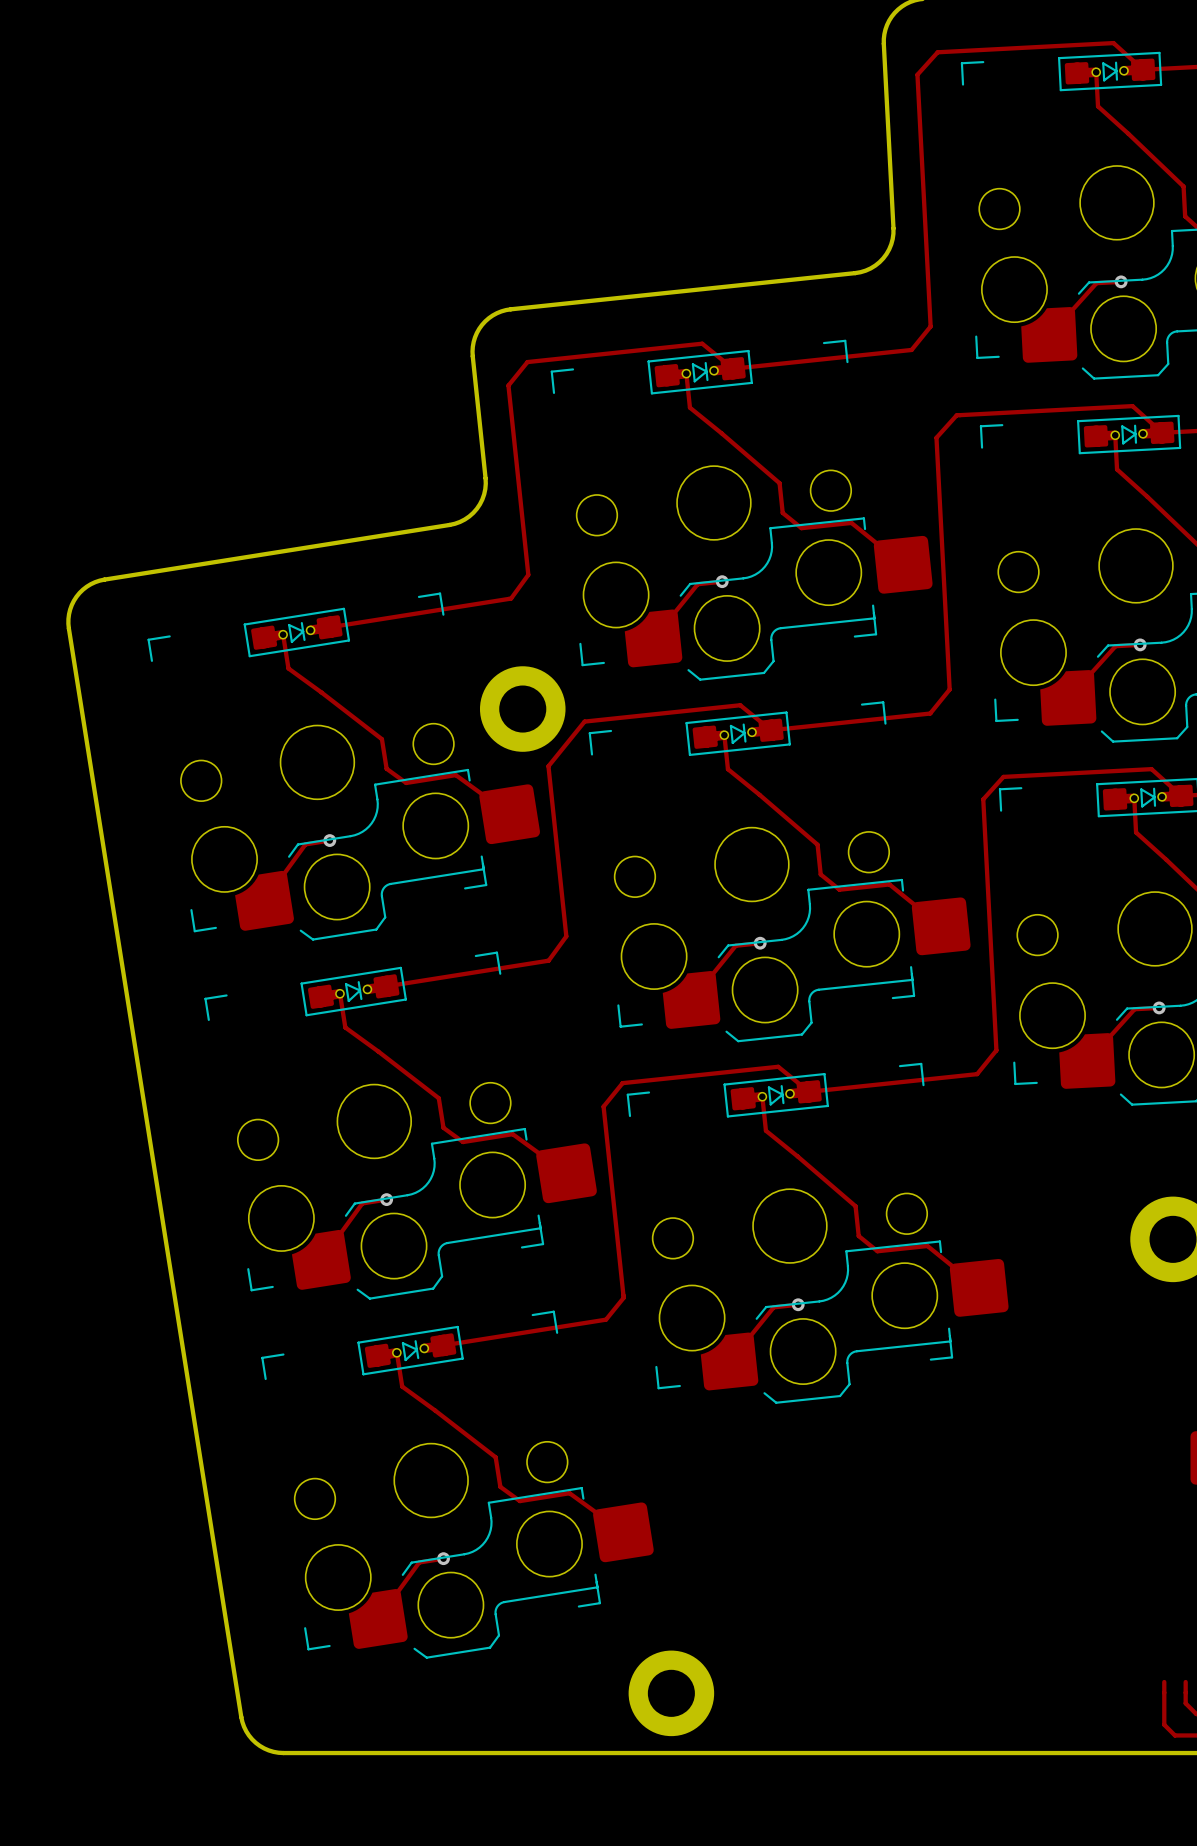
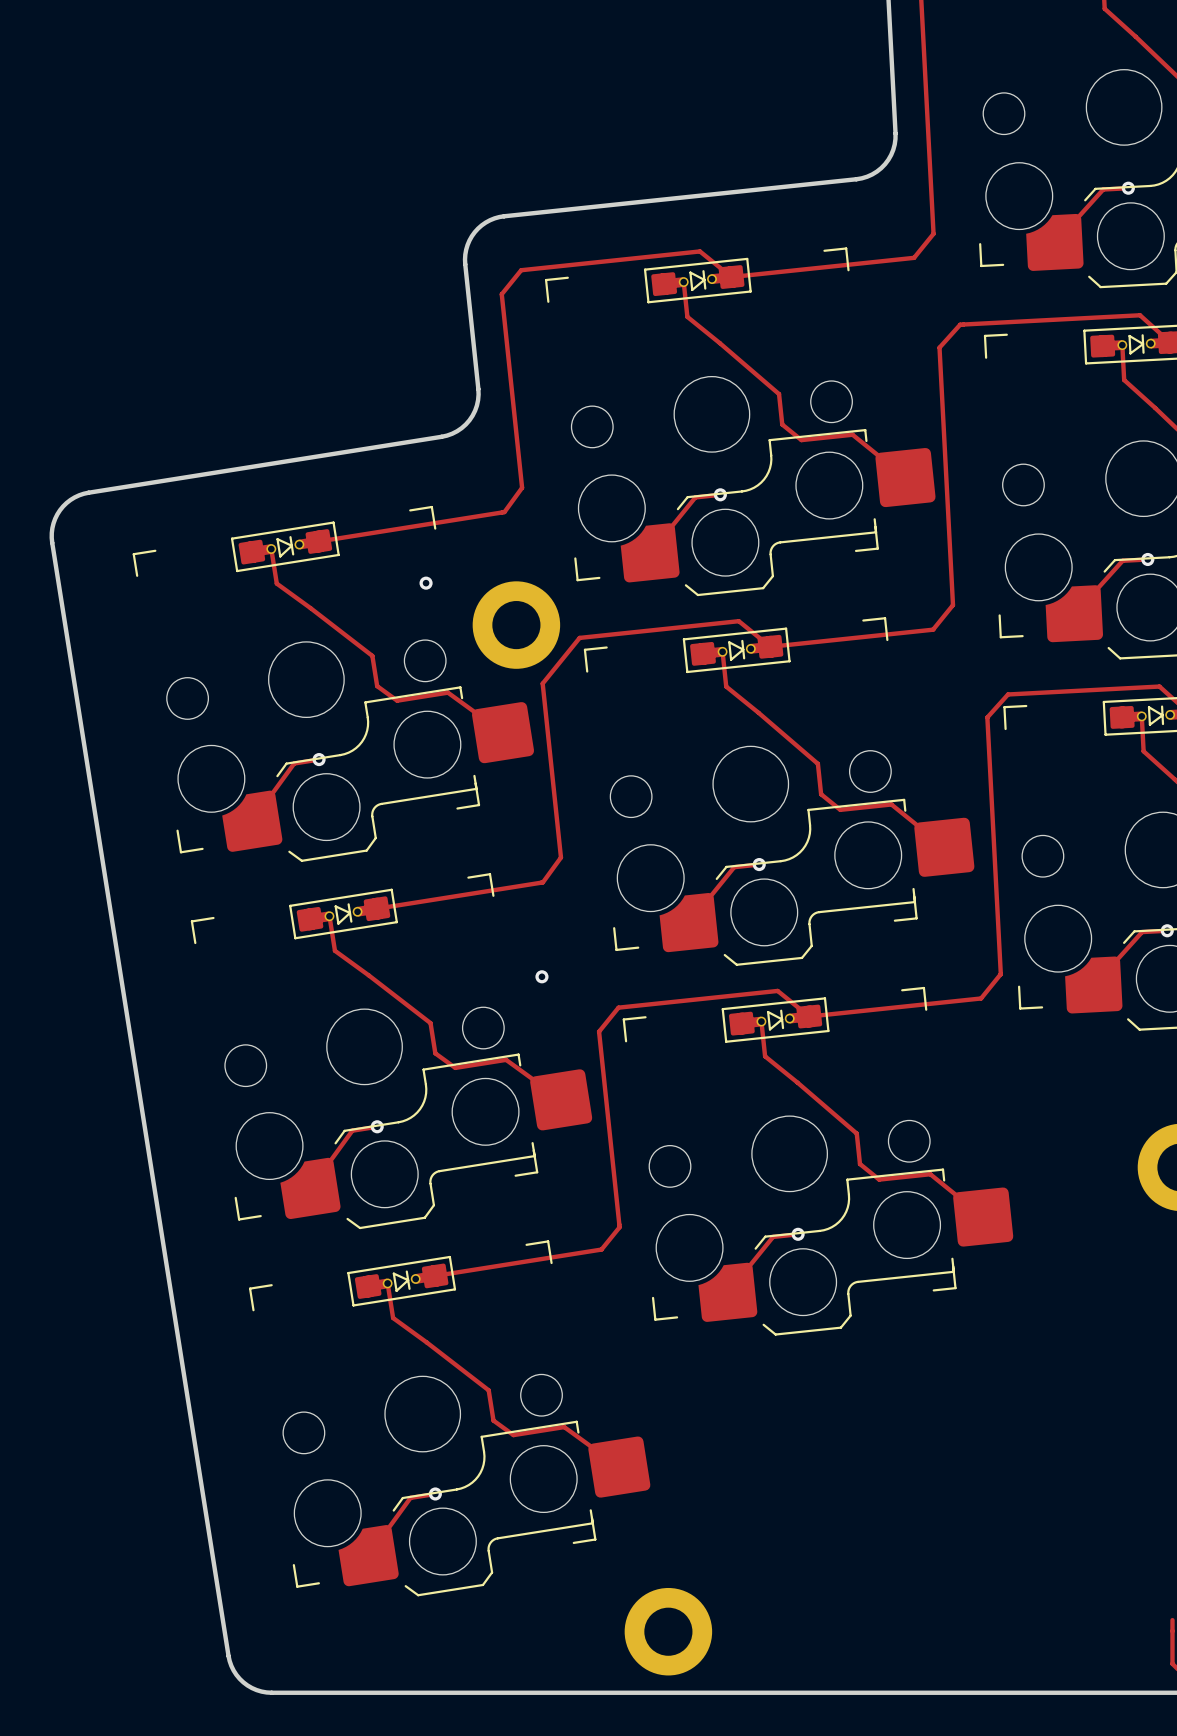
via: none -> (426, 583)
via: none -> (541, 976)

